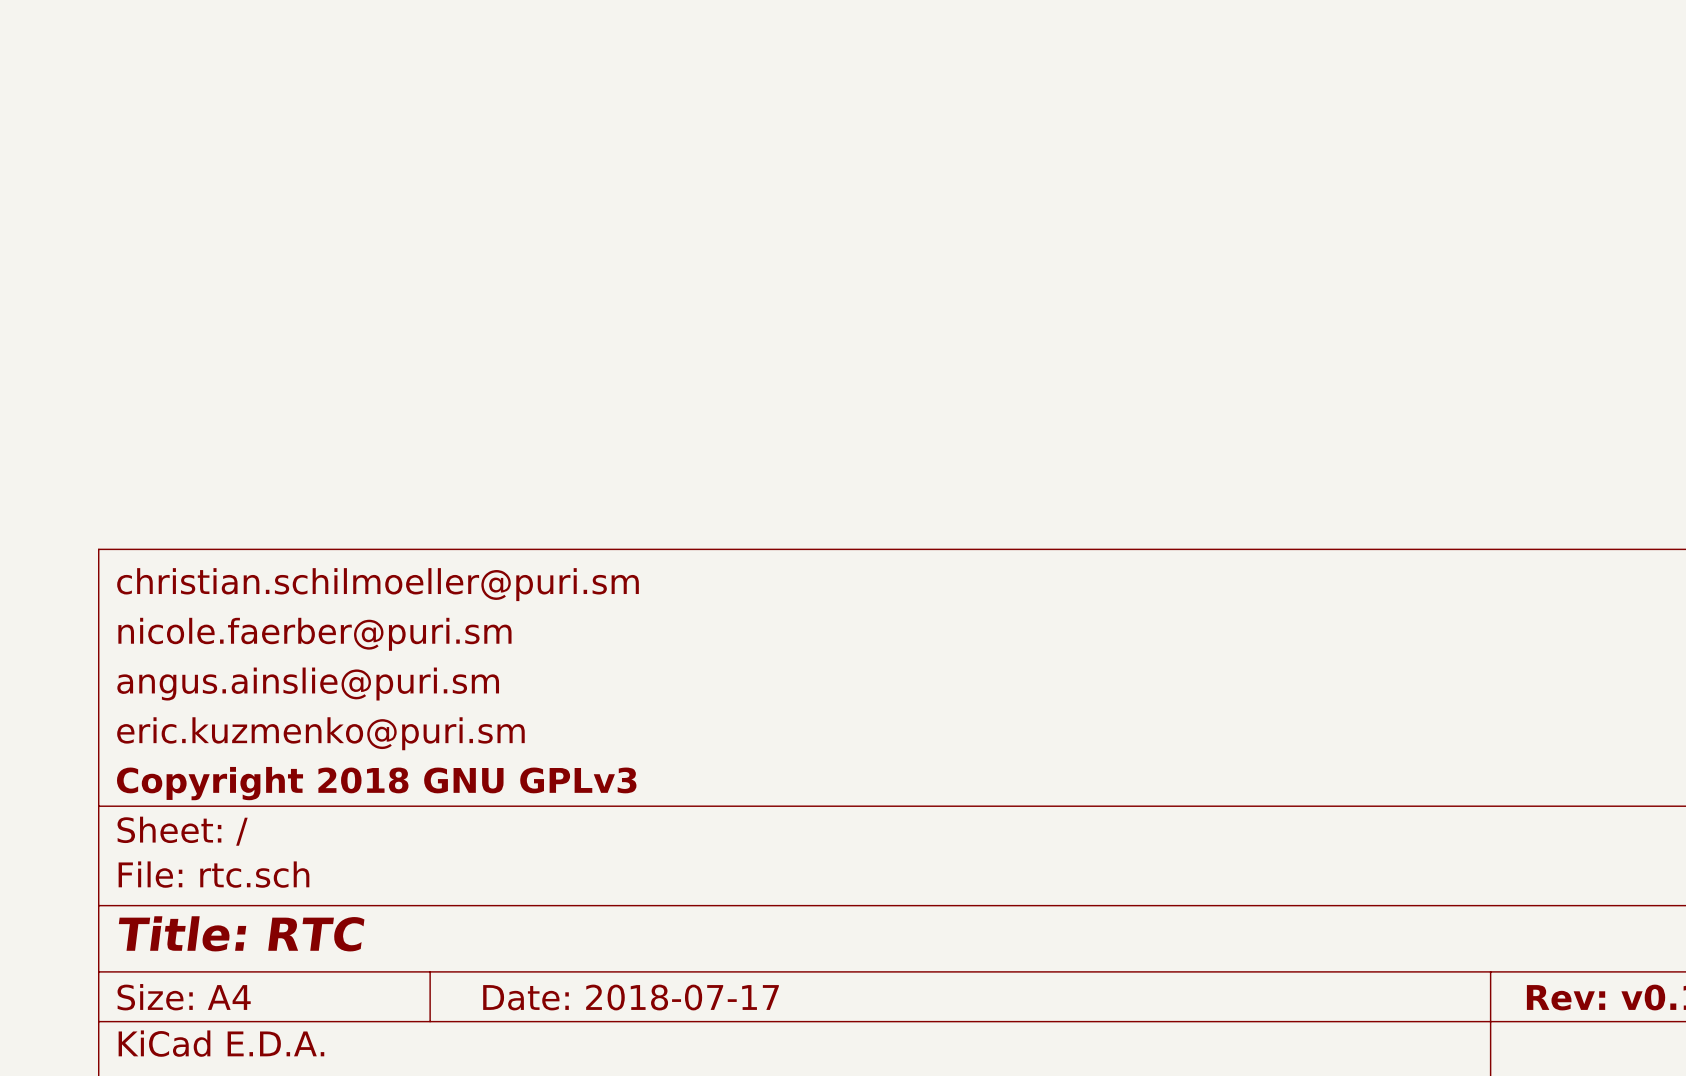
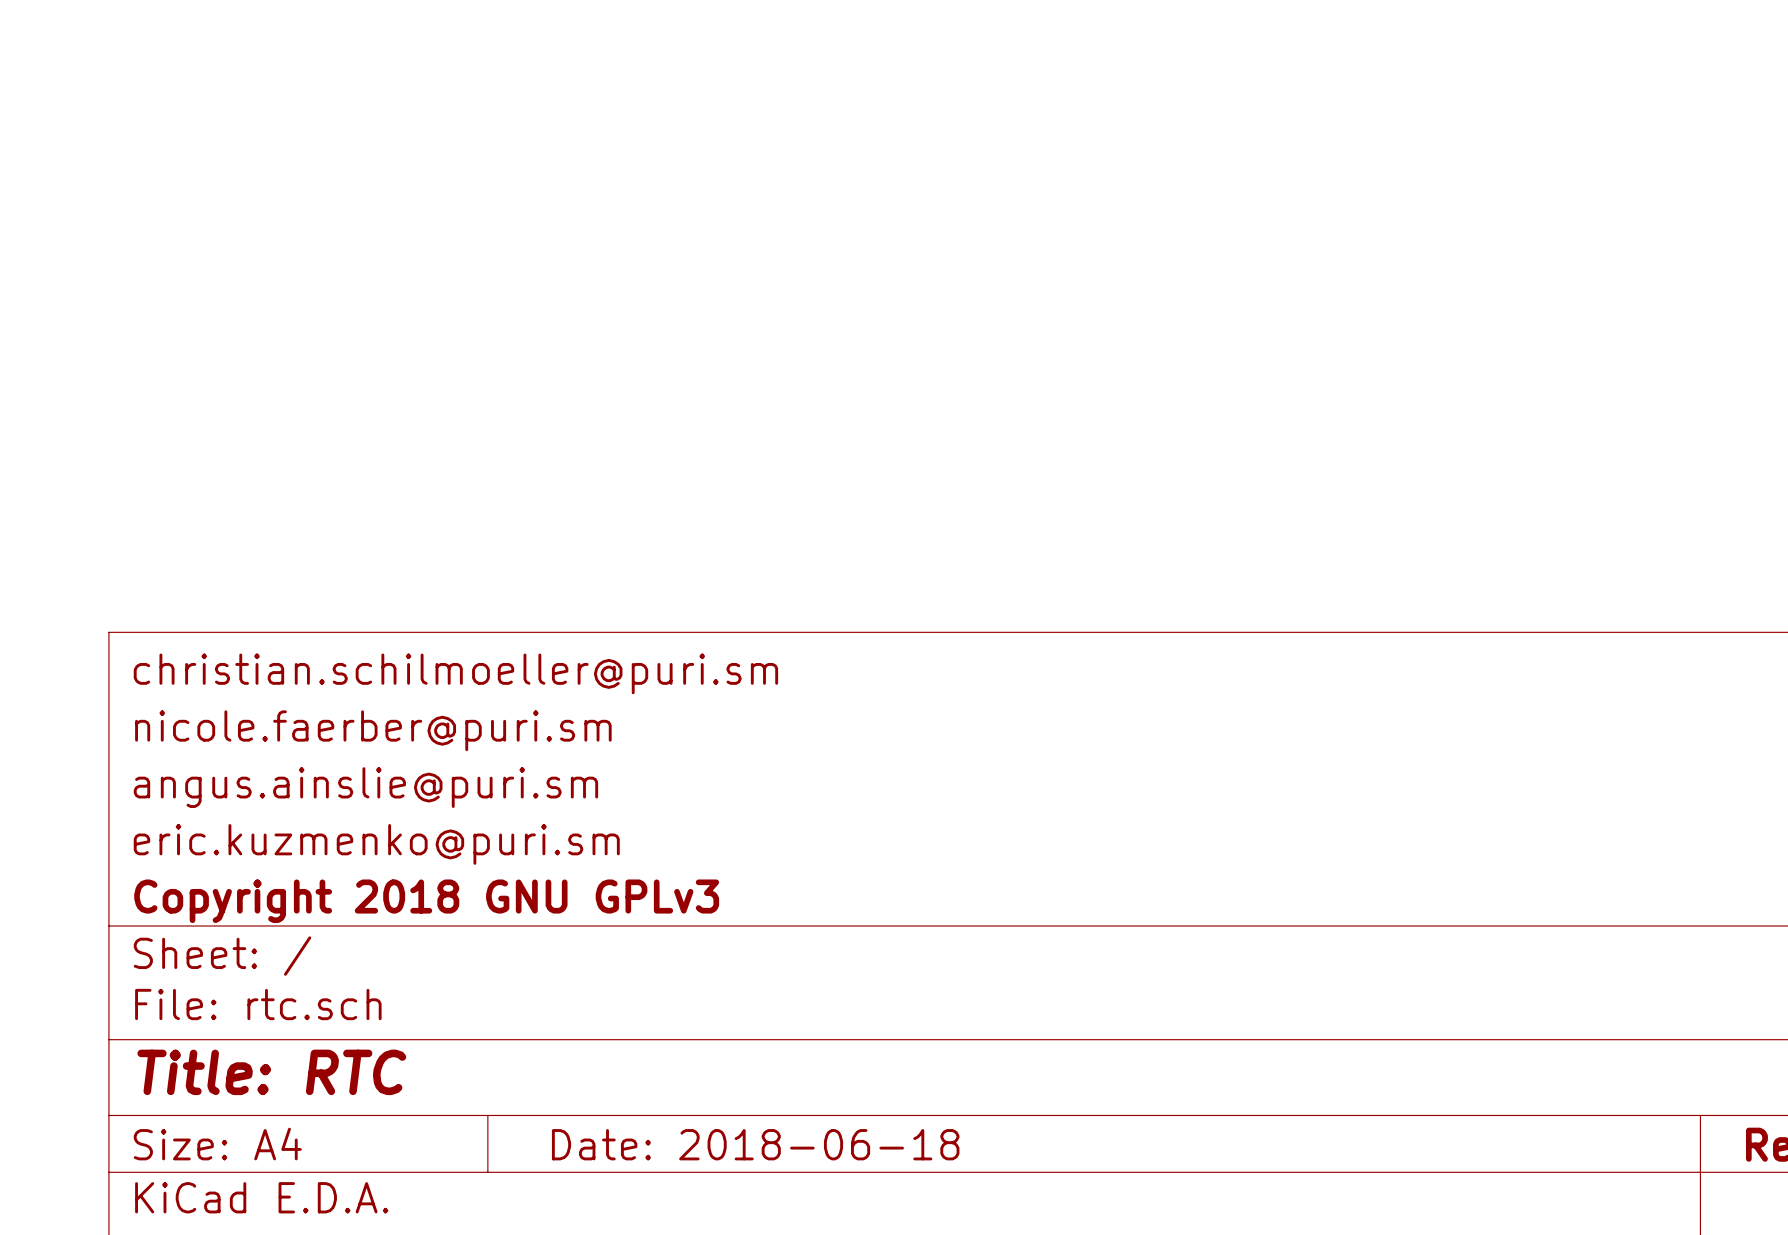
title block: Date: 2018-07-17 (631, 997) -> Date: 2018-06-18 (755, 1144)

